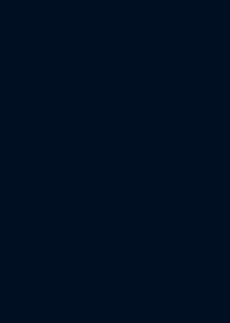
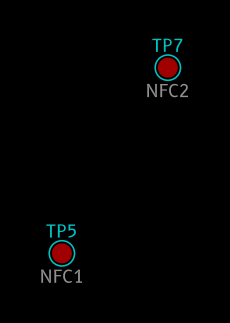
TP7: none -> NFC2 (167, 67)
TP5: none -> NFC1 (61, 253)

